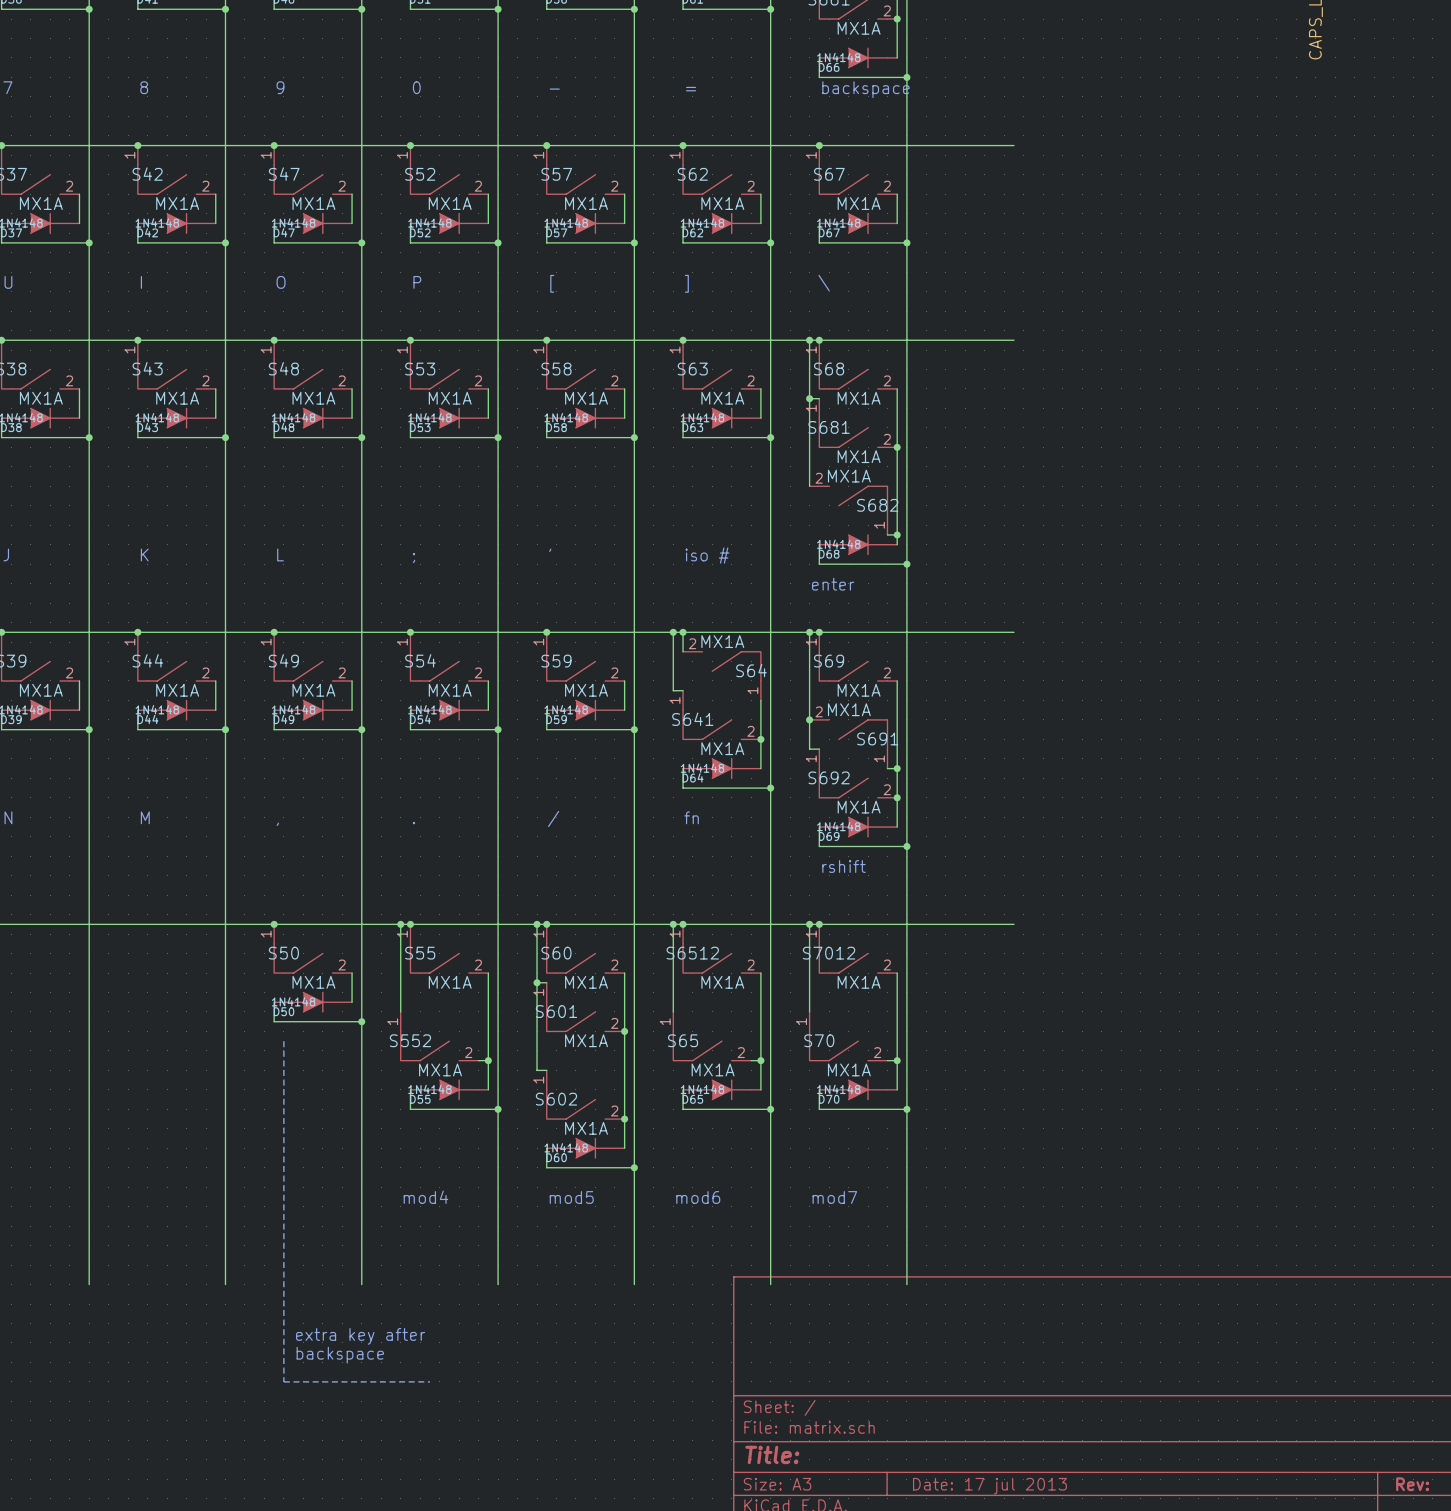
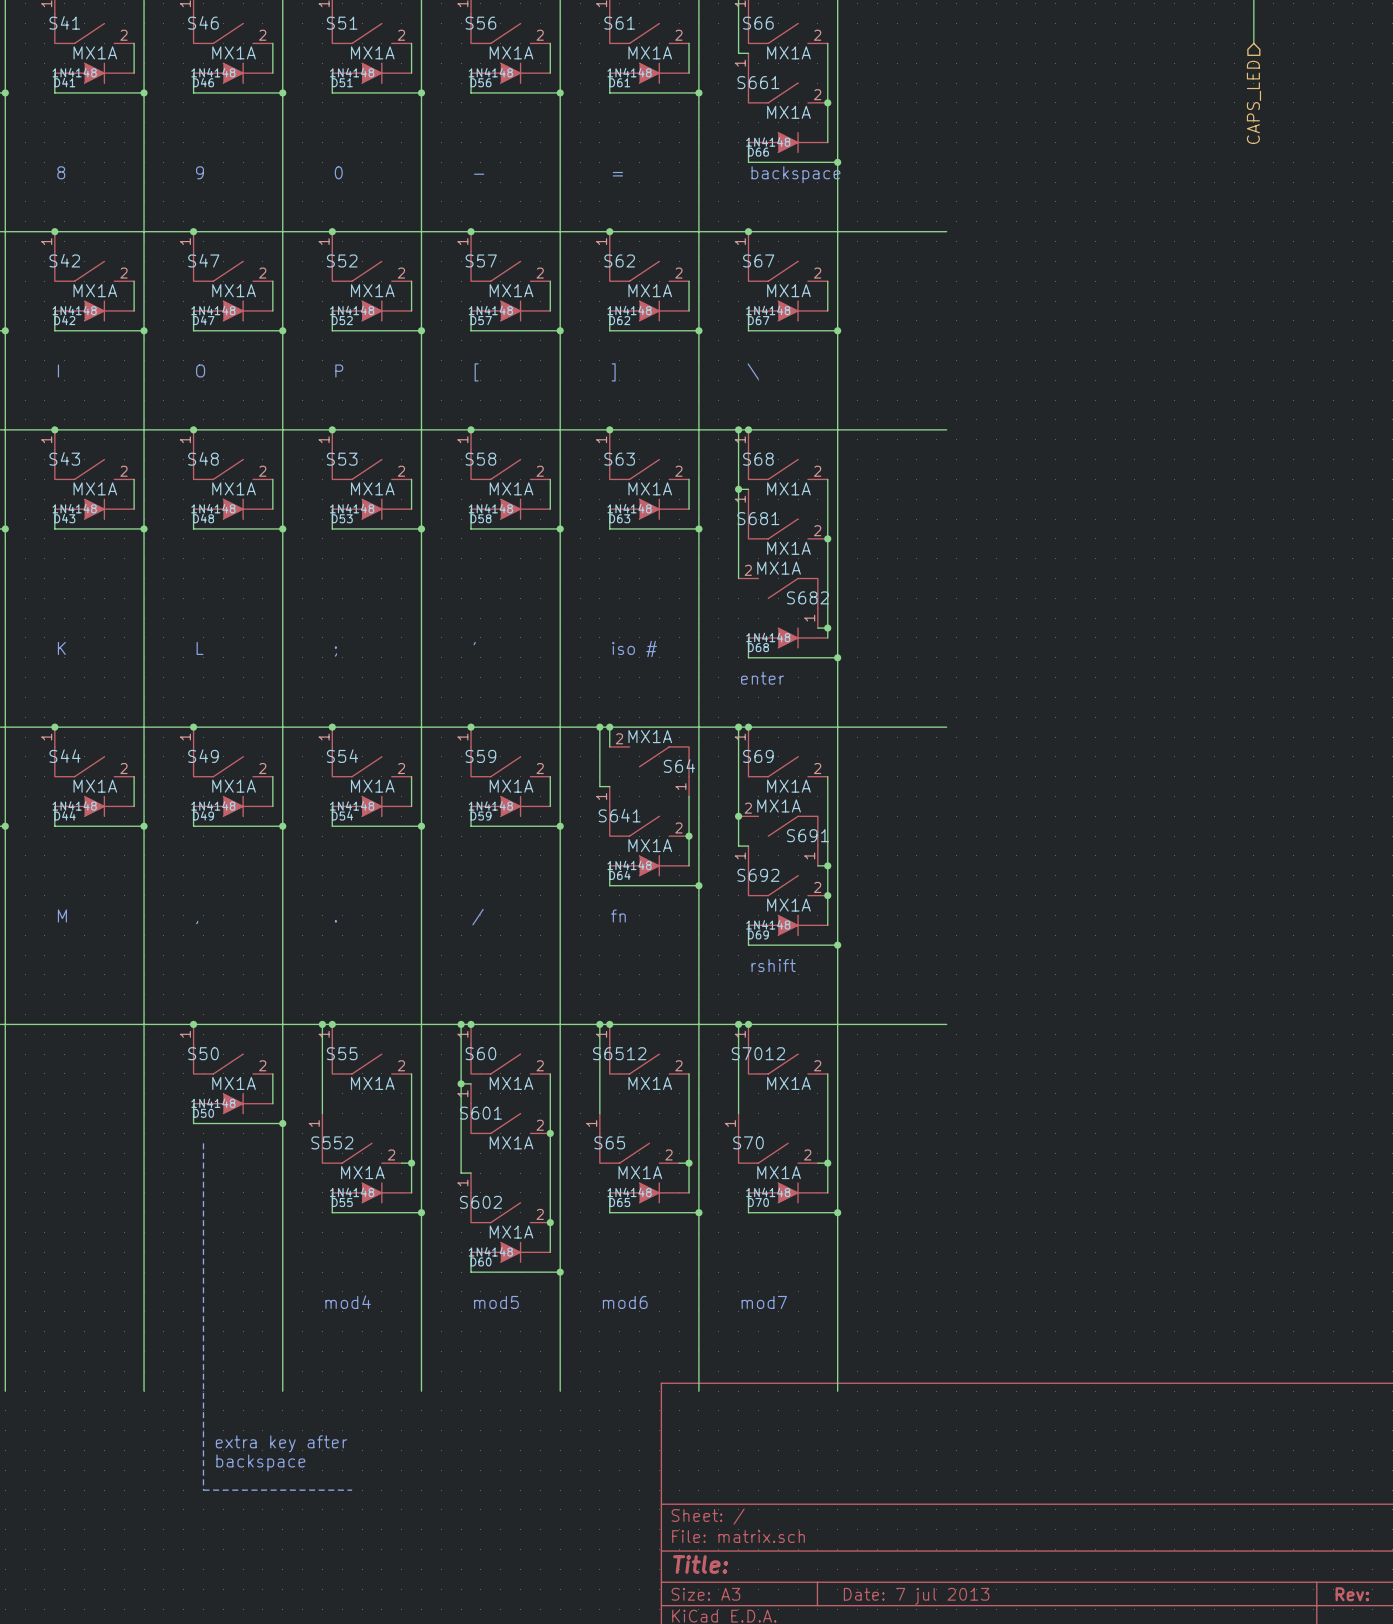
title block: Date: 17 jul 2013 (989, 1486) -> Date: 7 jul 2013 (916, 1596)

